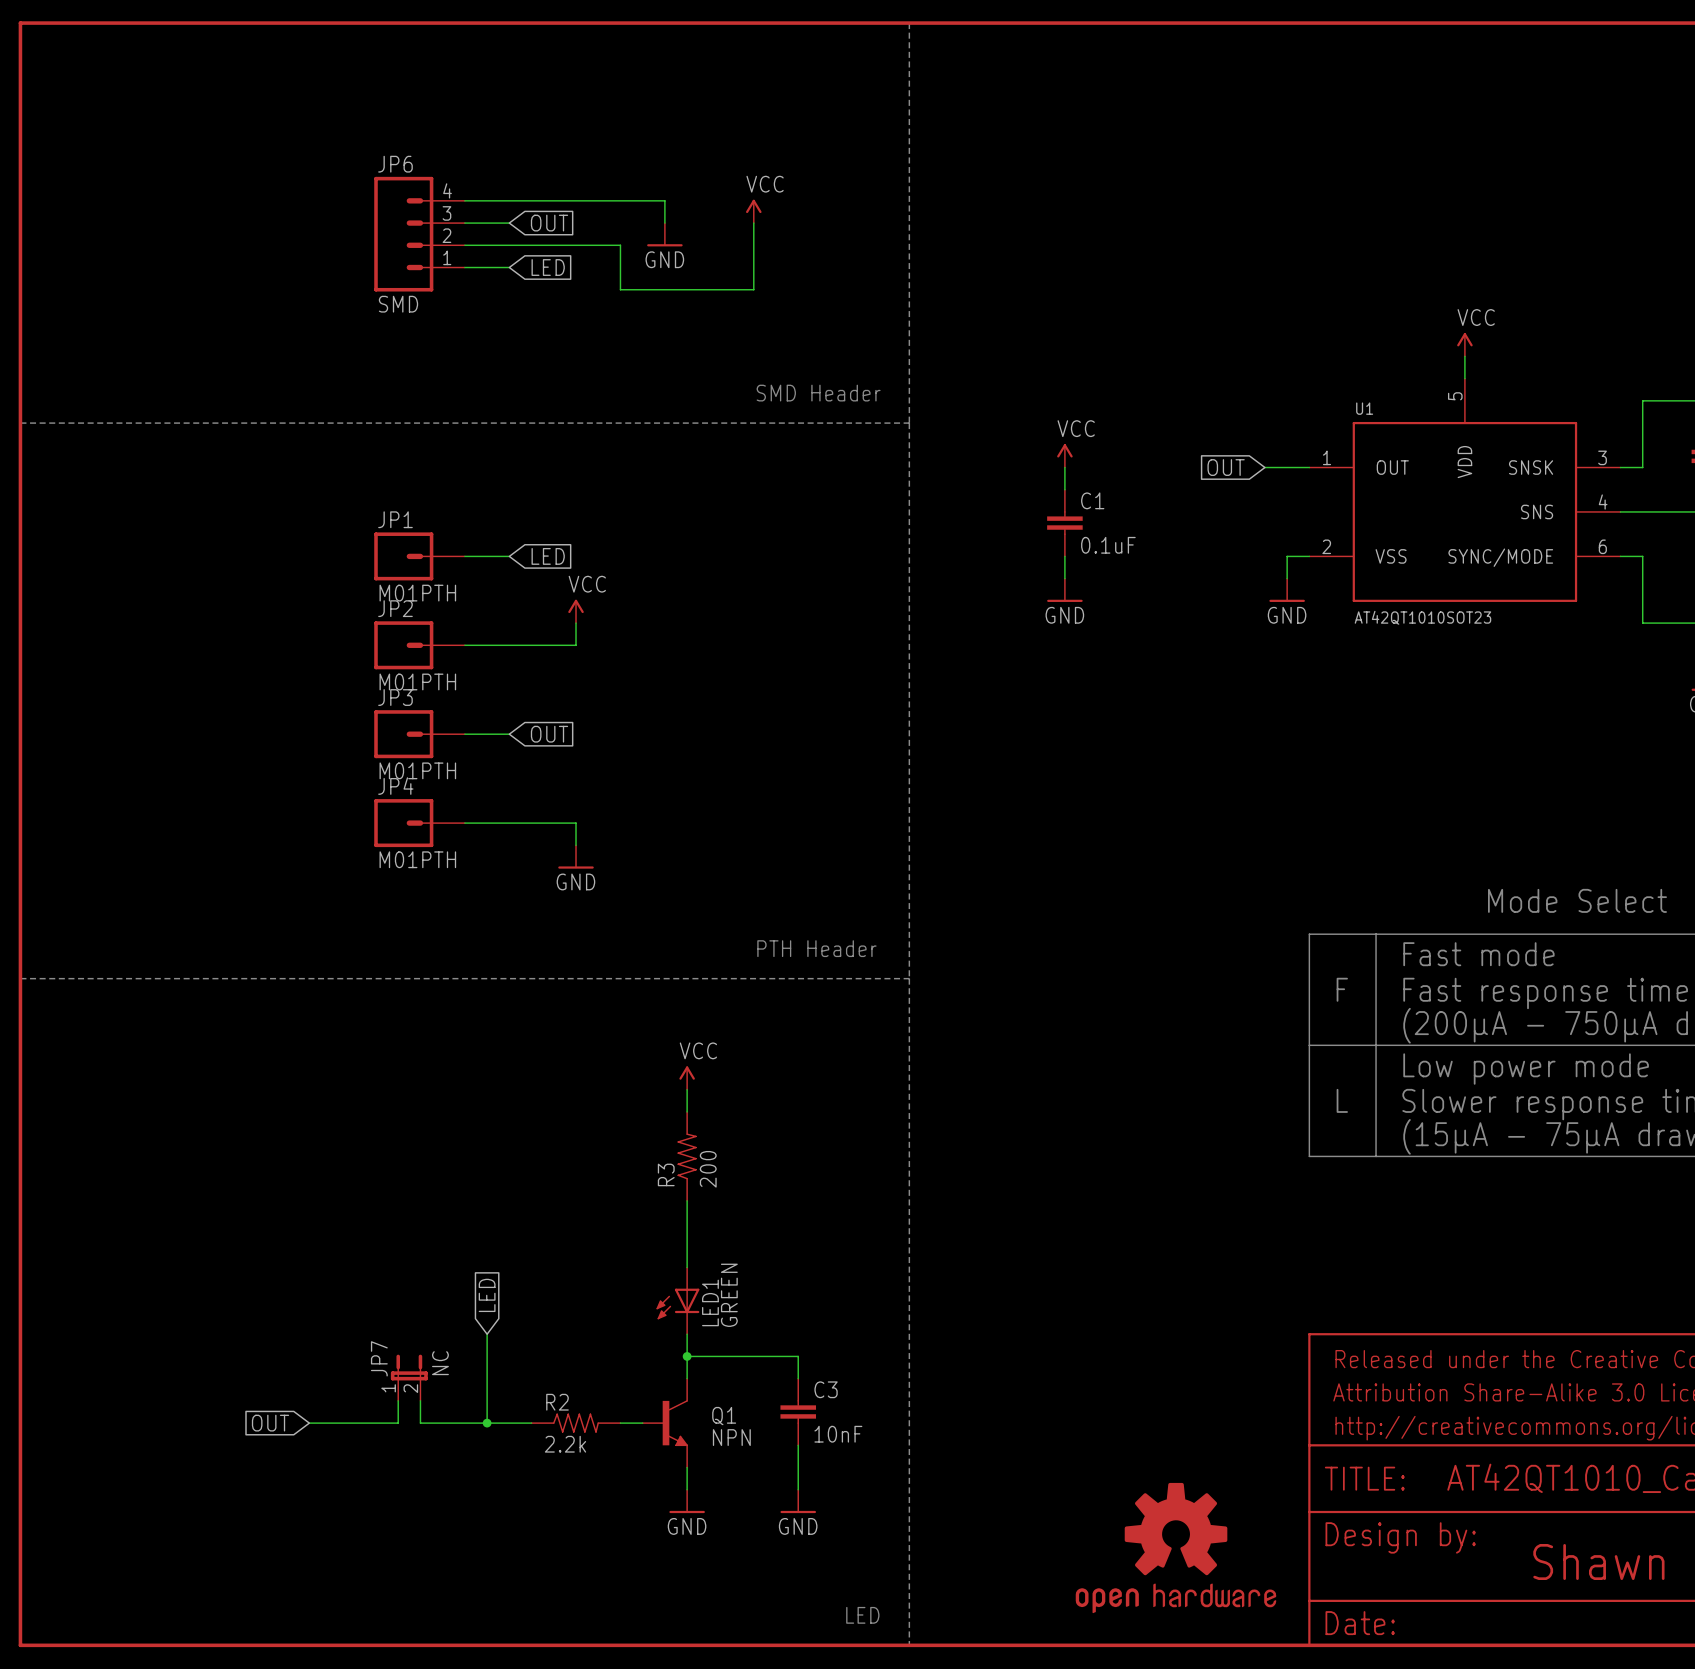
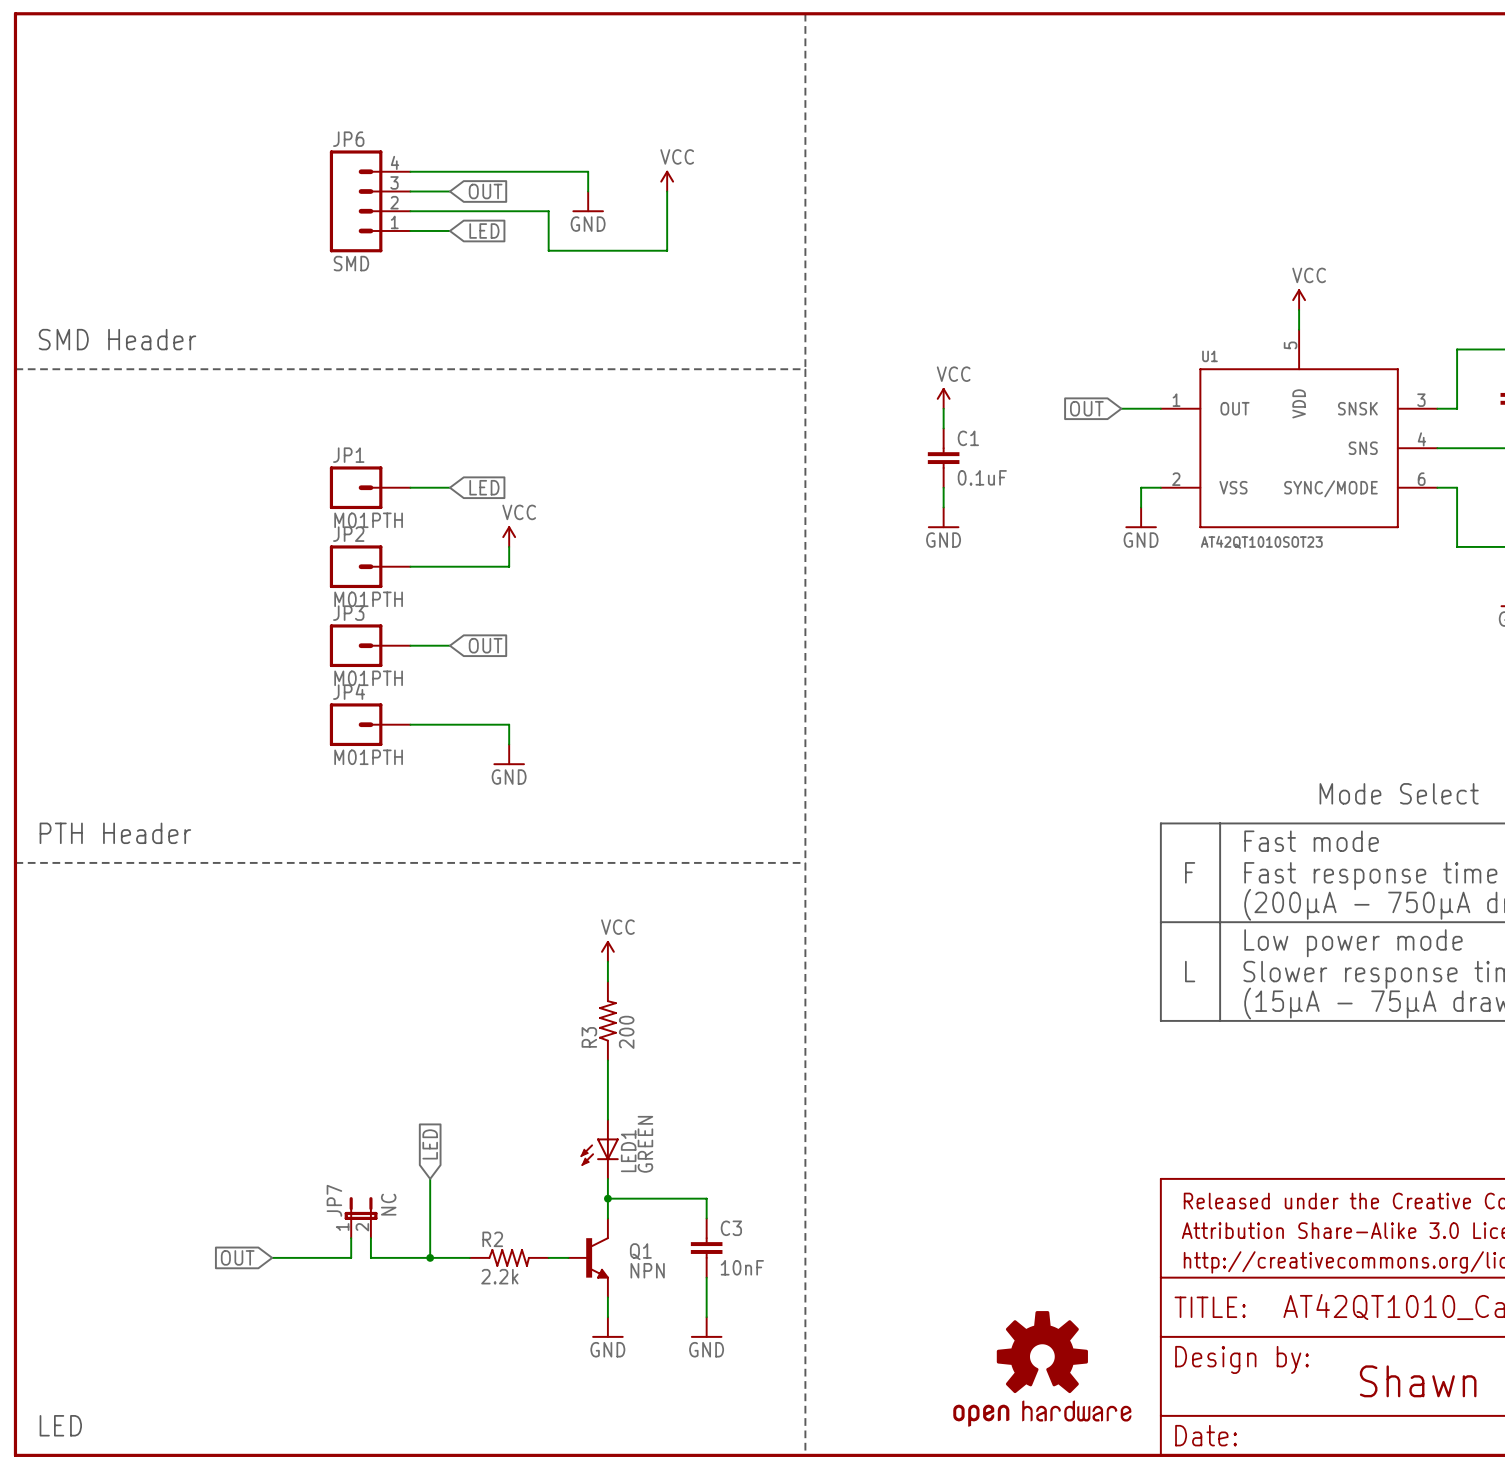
text: none -> SMD Header (117, 339)
text: SMD Header (818, 393) -> none
text: none -> PTH Header (115, 833)
text: PTH Header (816, 948) -> none
text: none -> LED (60, 1425)
text: LED (862, 1615) -> none

